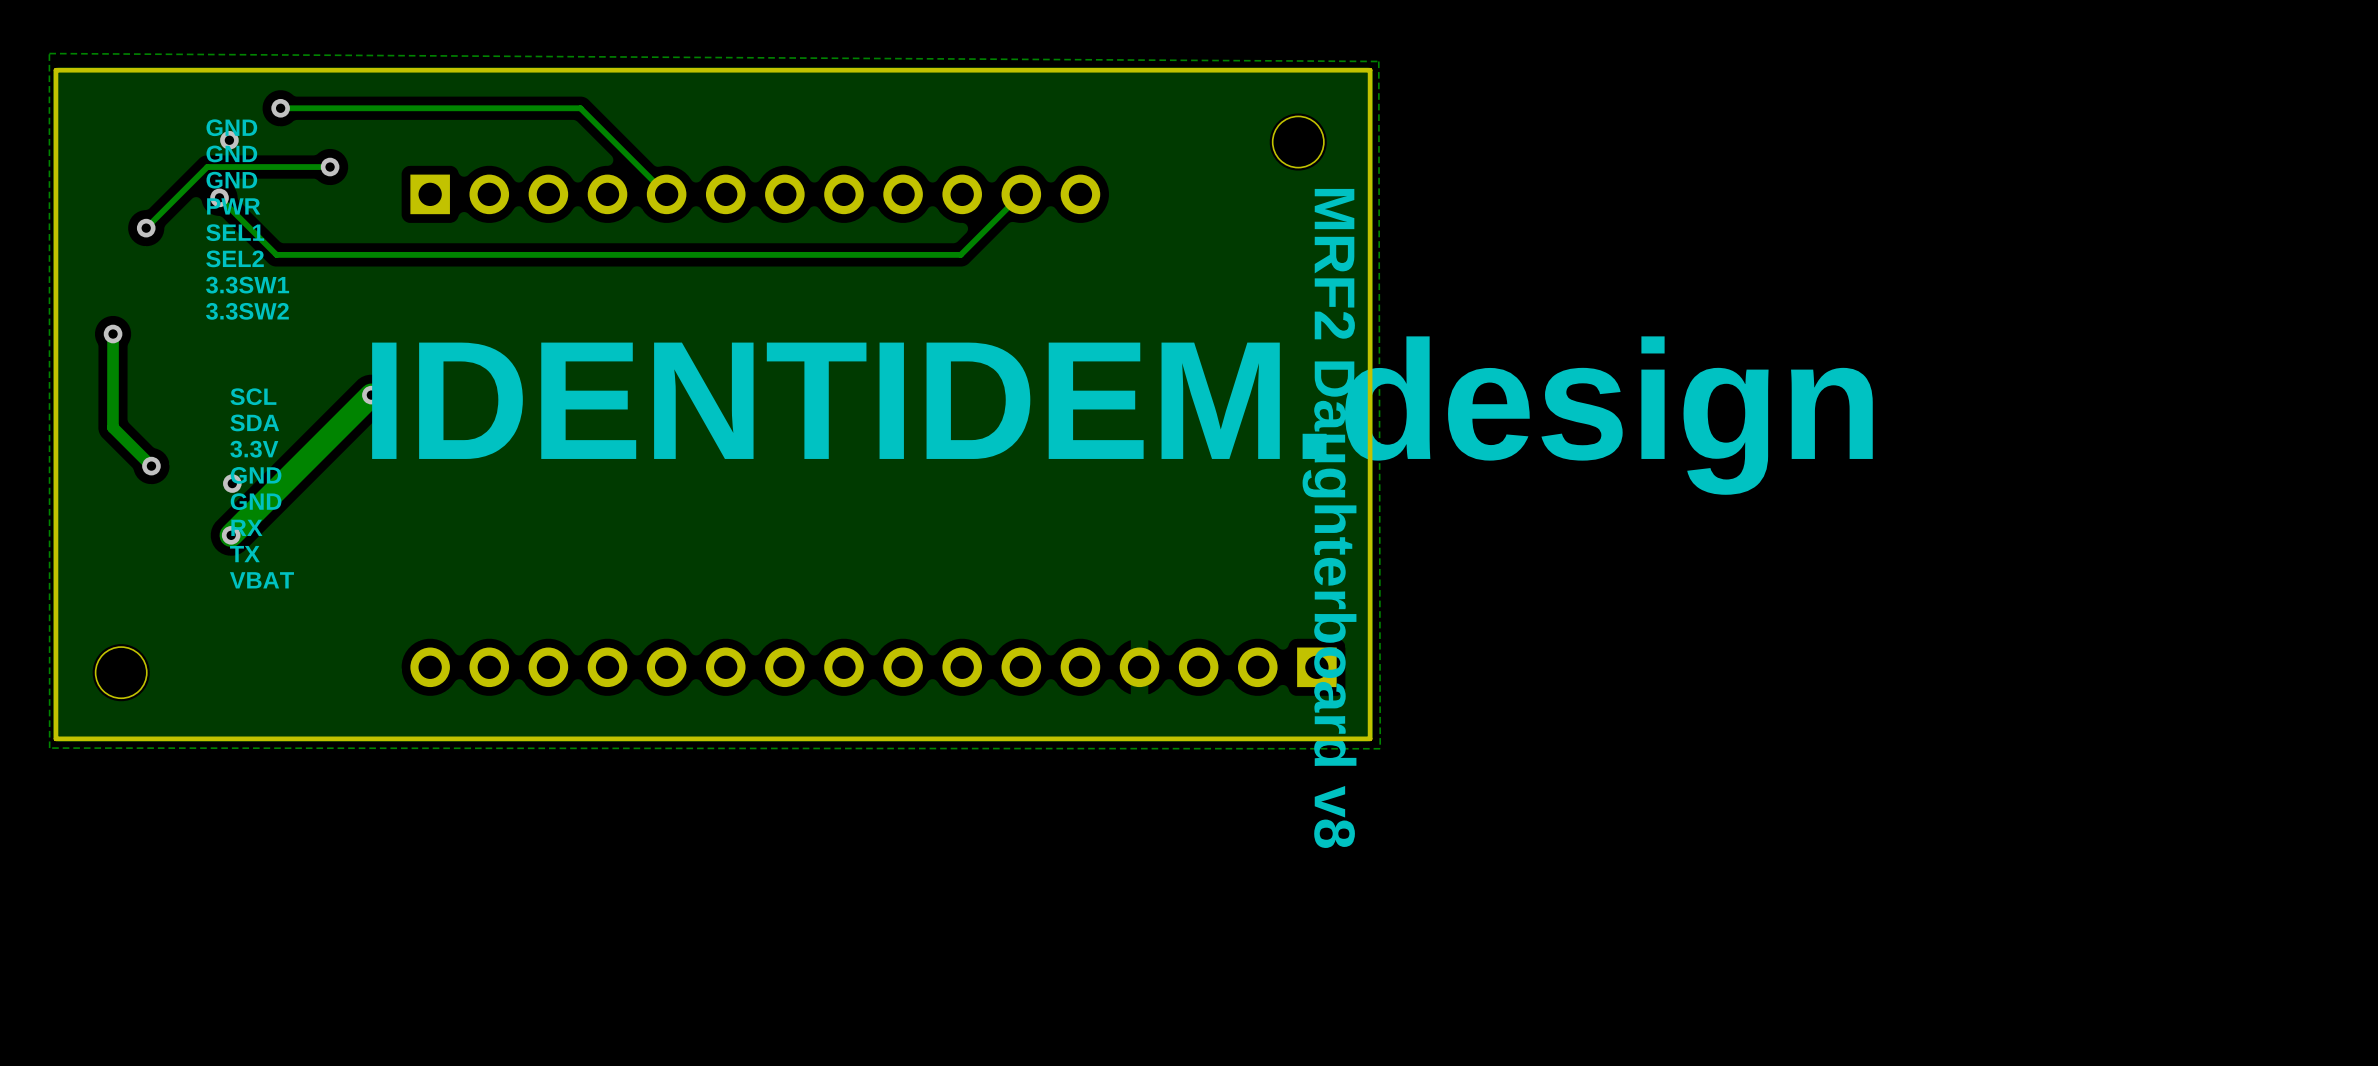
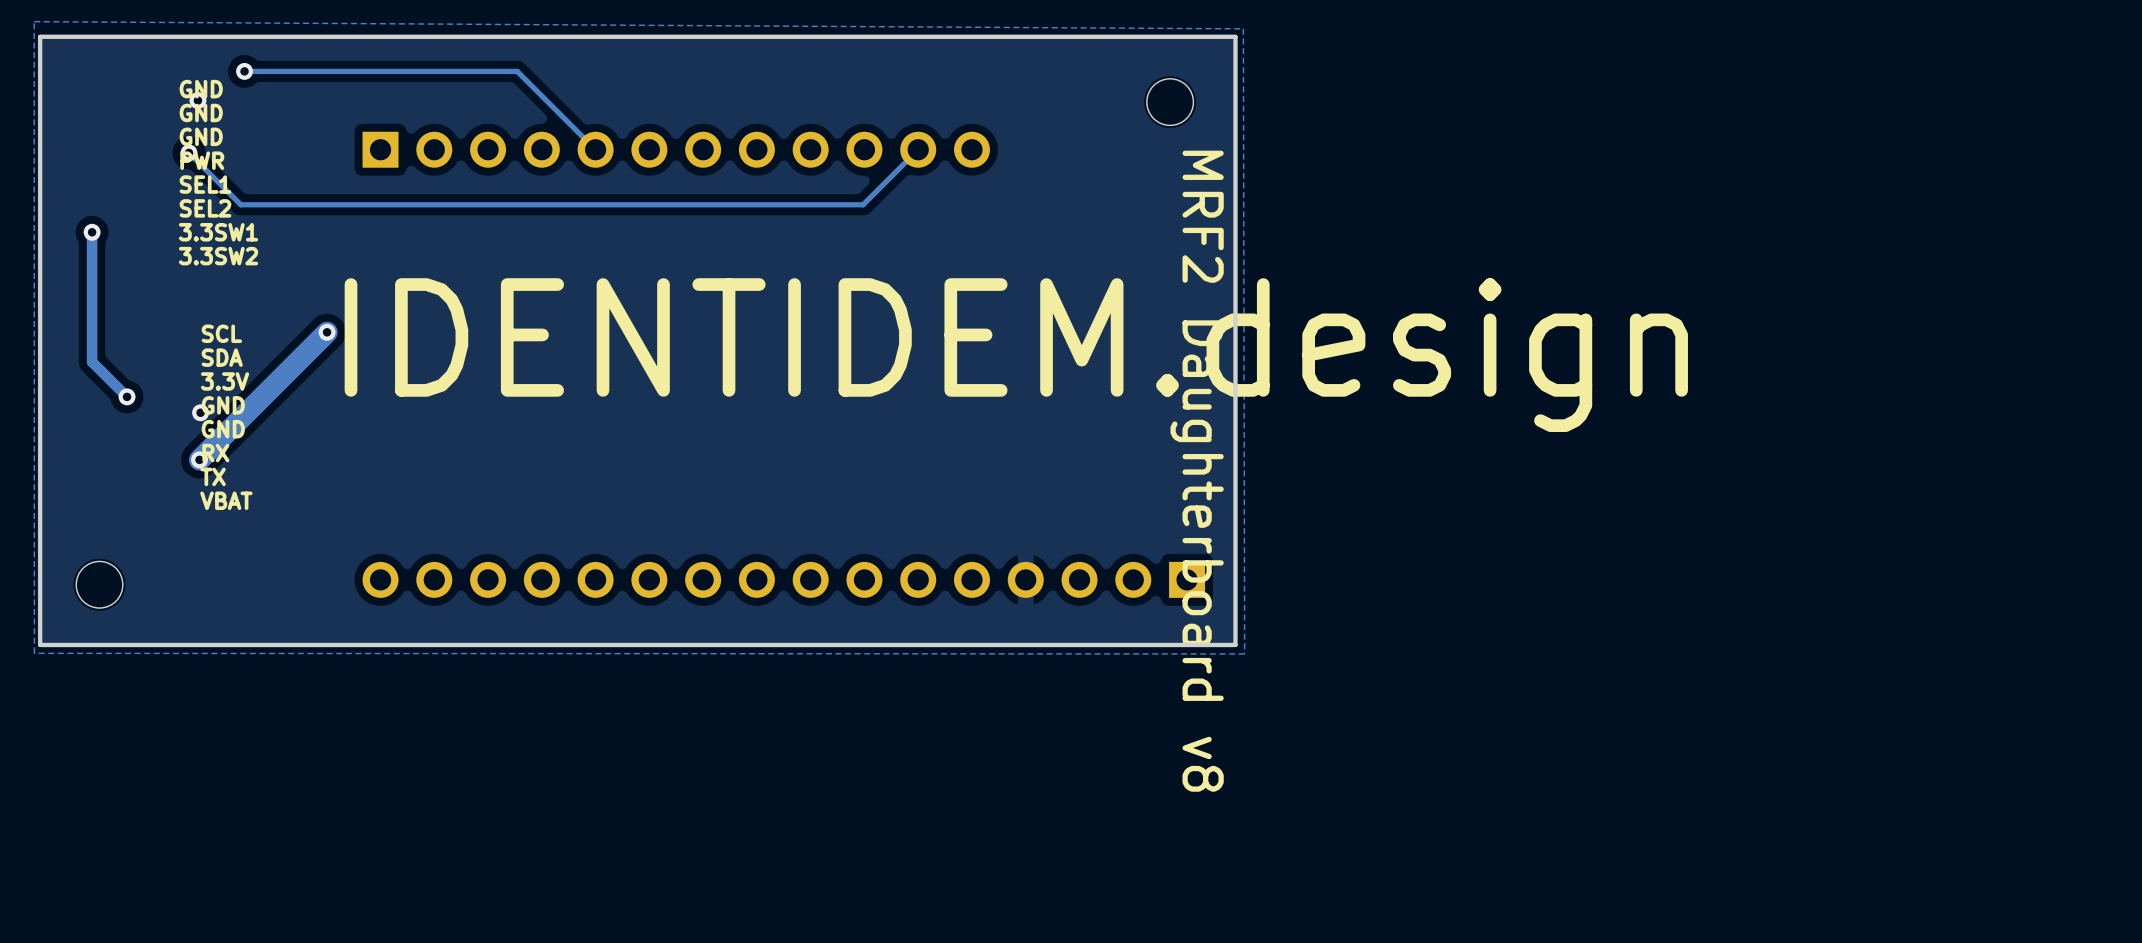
track: (330, 167) (207, 167) (146, 228) -> none
via: (330, 167) -> none
via: (146, 228) -> none
via: none -> (92, 232)
track: (113, 334) (112, 427) -> (92, 232) (92, 361)
via: (113, 334) -> none

